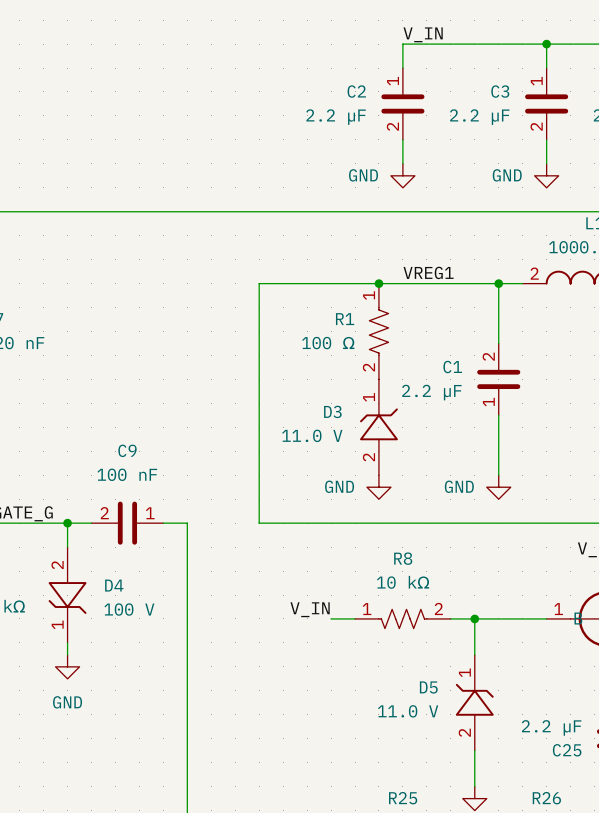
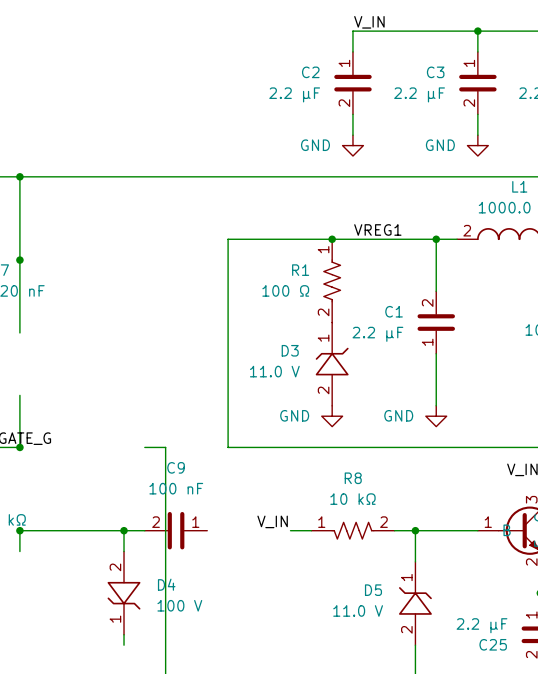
wire: none -> (19, 176) (19, 332)
junction: none -> (19, 176)
junction: none -> (19, 260)
wire: (19, 523) (91, 523) -> (19, 447) (19, 395)
junction: none -> (19, 447)
wire: (67, 523) (67, 547) -> (124, 530) (124, 551)
junction: (67, 523) -> none
C9 position: (127, 523) -> (176, 530)
D4 position: (67, 595) -> (124, 593)
junction: none -> (19, 530)
junction: none -> (124, 530)
wire: none -> (144, 530) (19, 530) (19, 551)
wire: (67, 642) (67, 654) -> (124, 634) (124, 645)
power symbol: GND (67, 666) -> none

